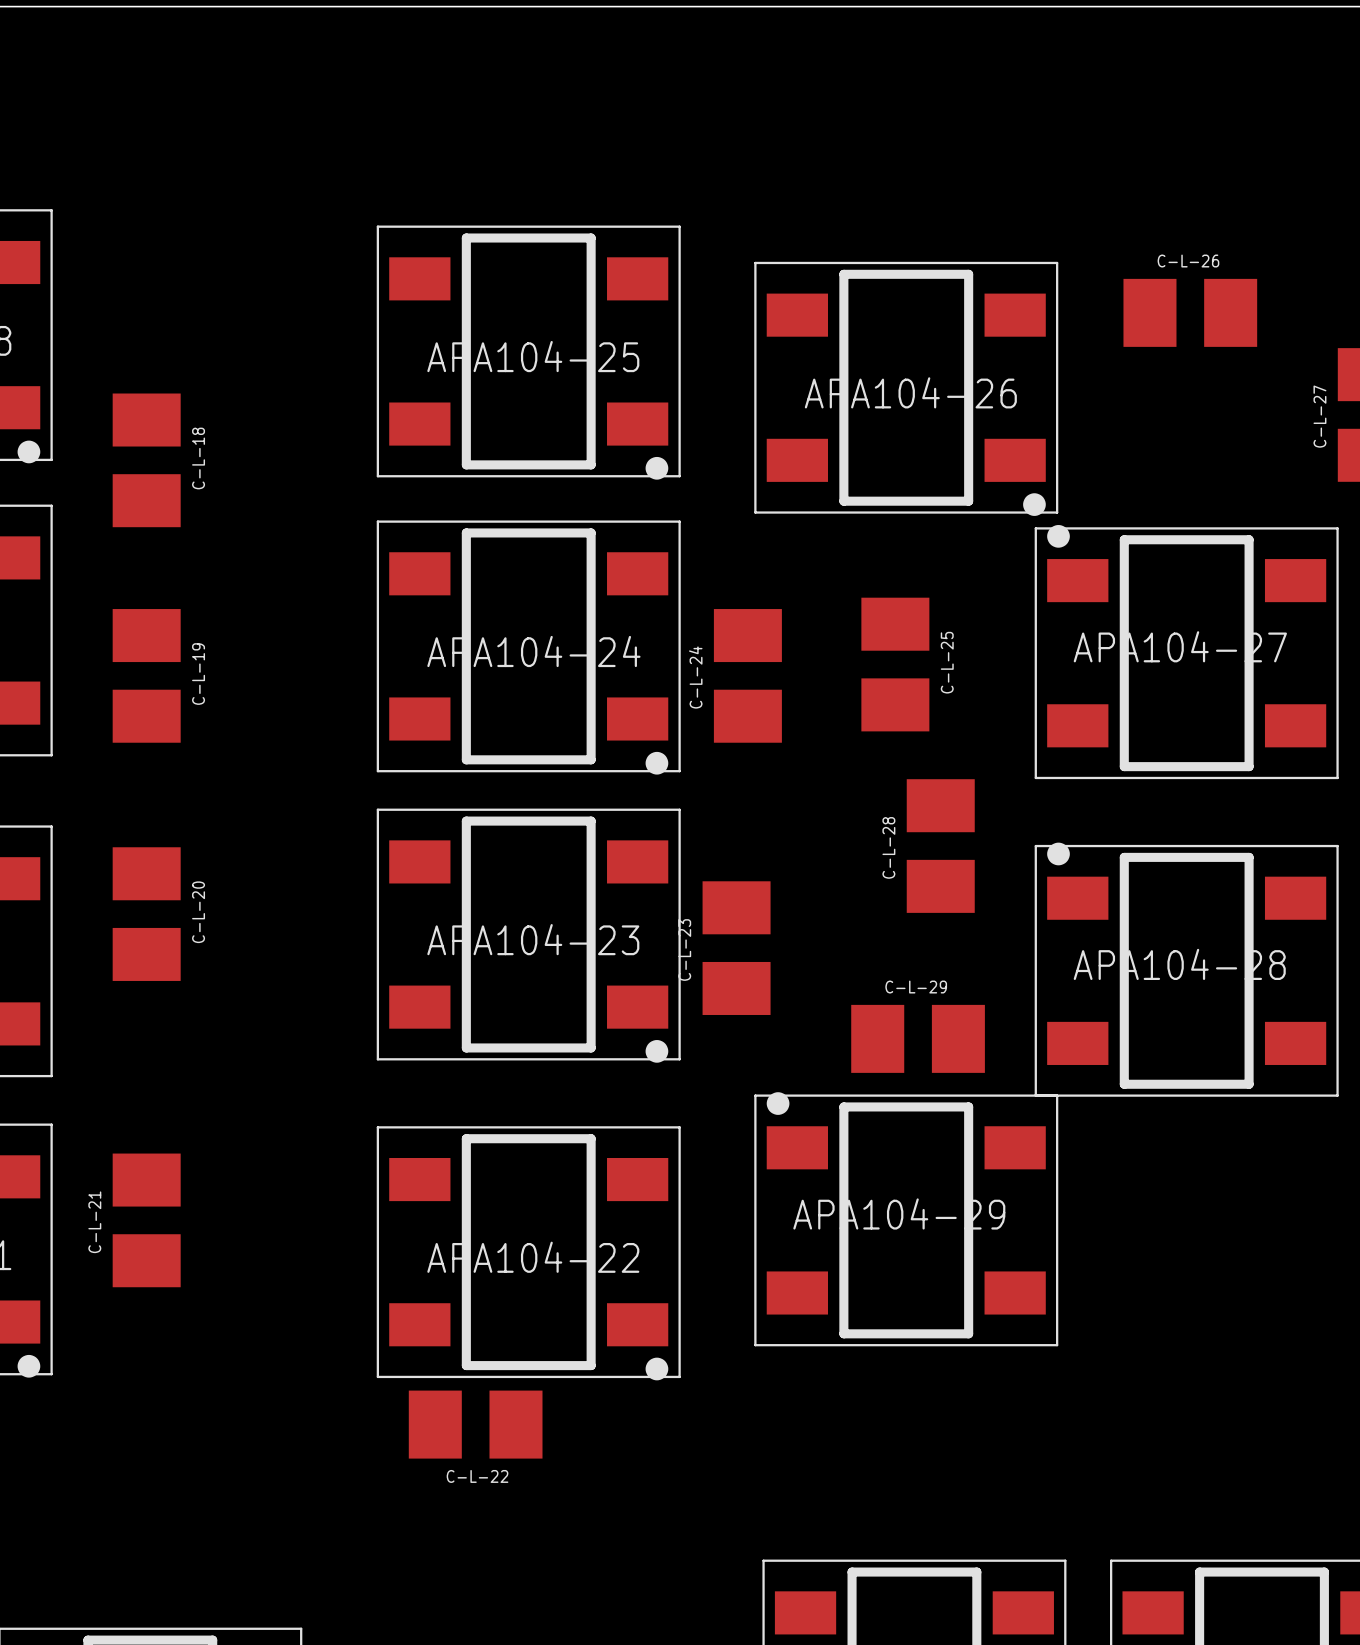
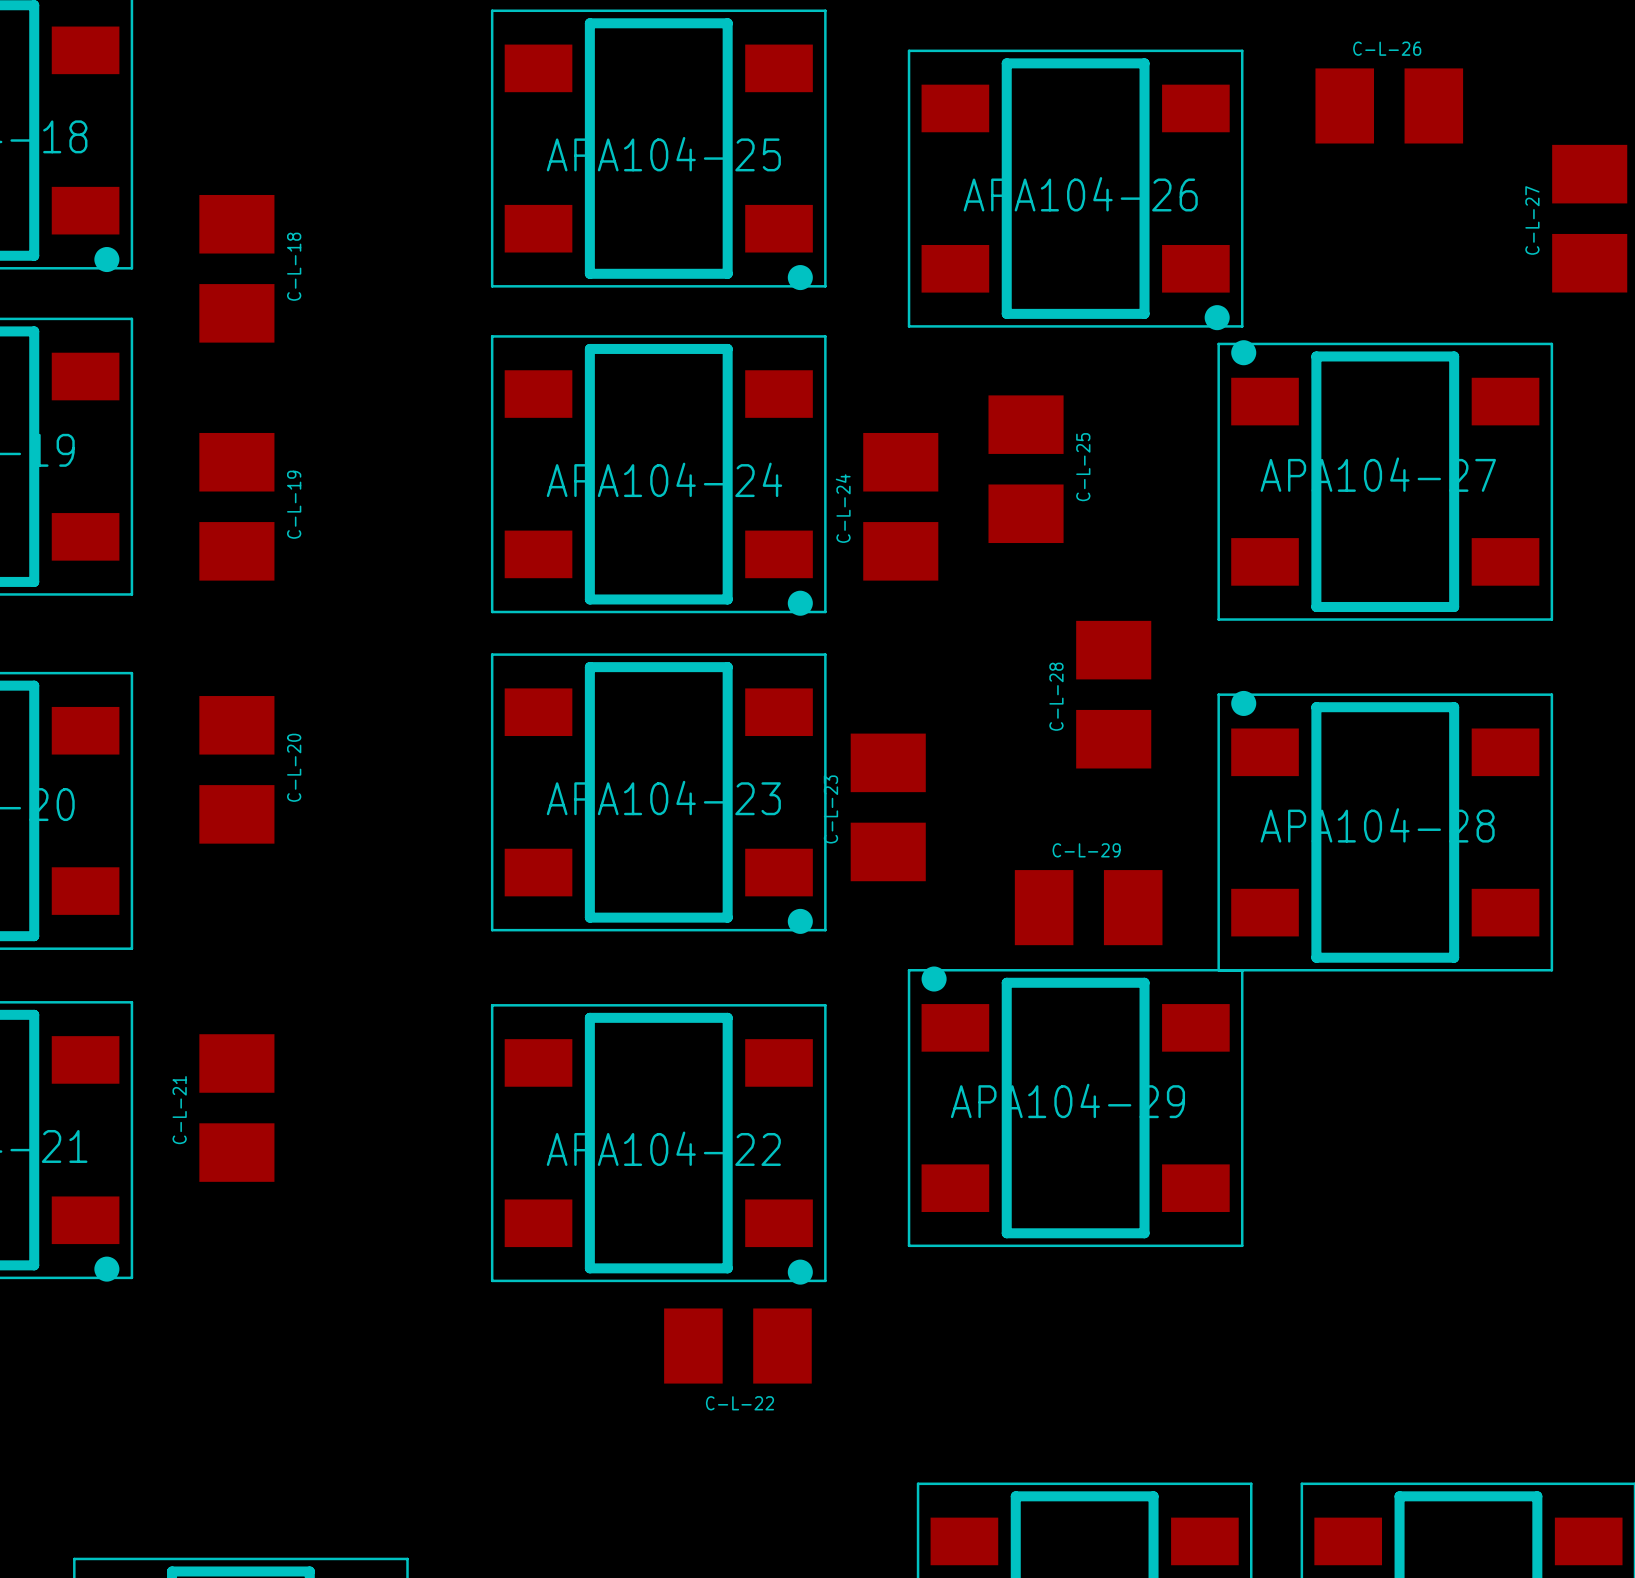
C-L-25 position: (895, 664) -> (1026, 469)
C-L-22 position: (475, 1424) -> (737, 1346)

